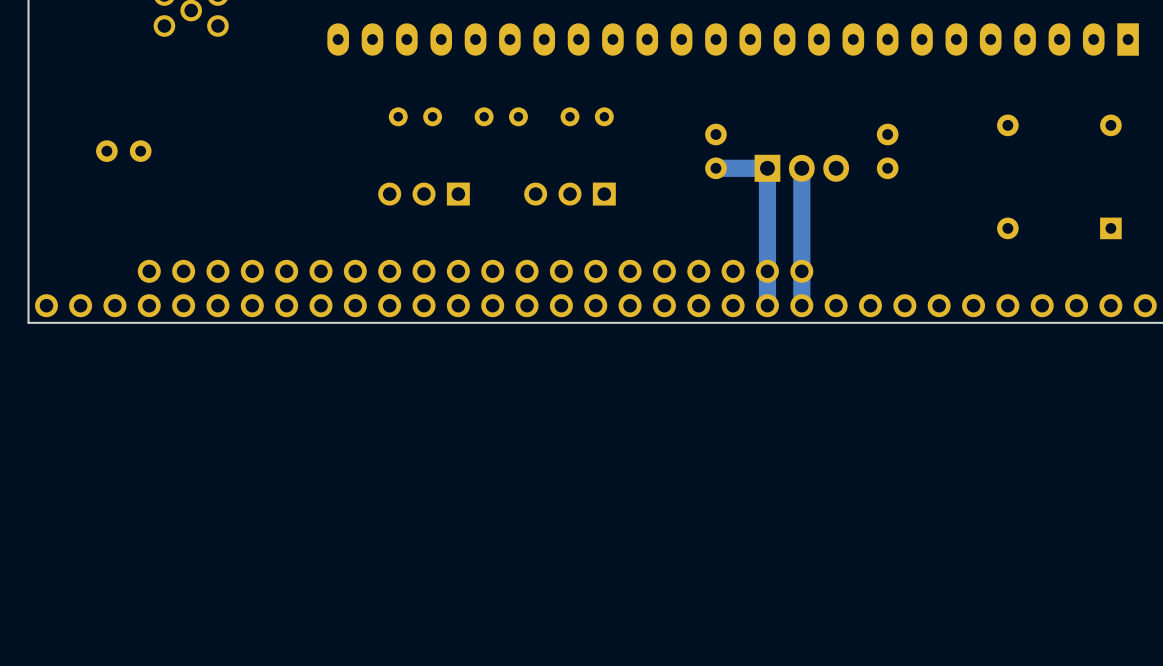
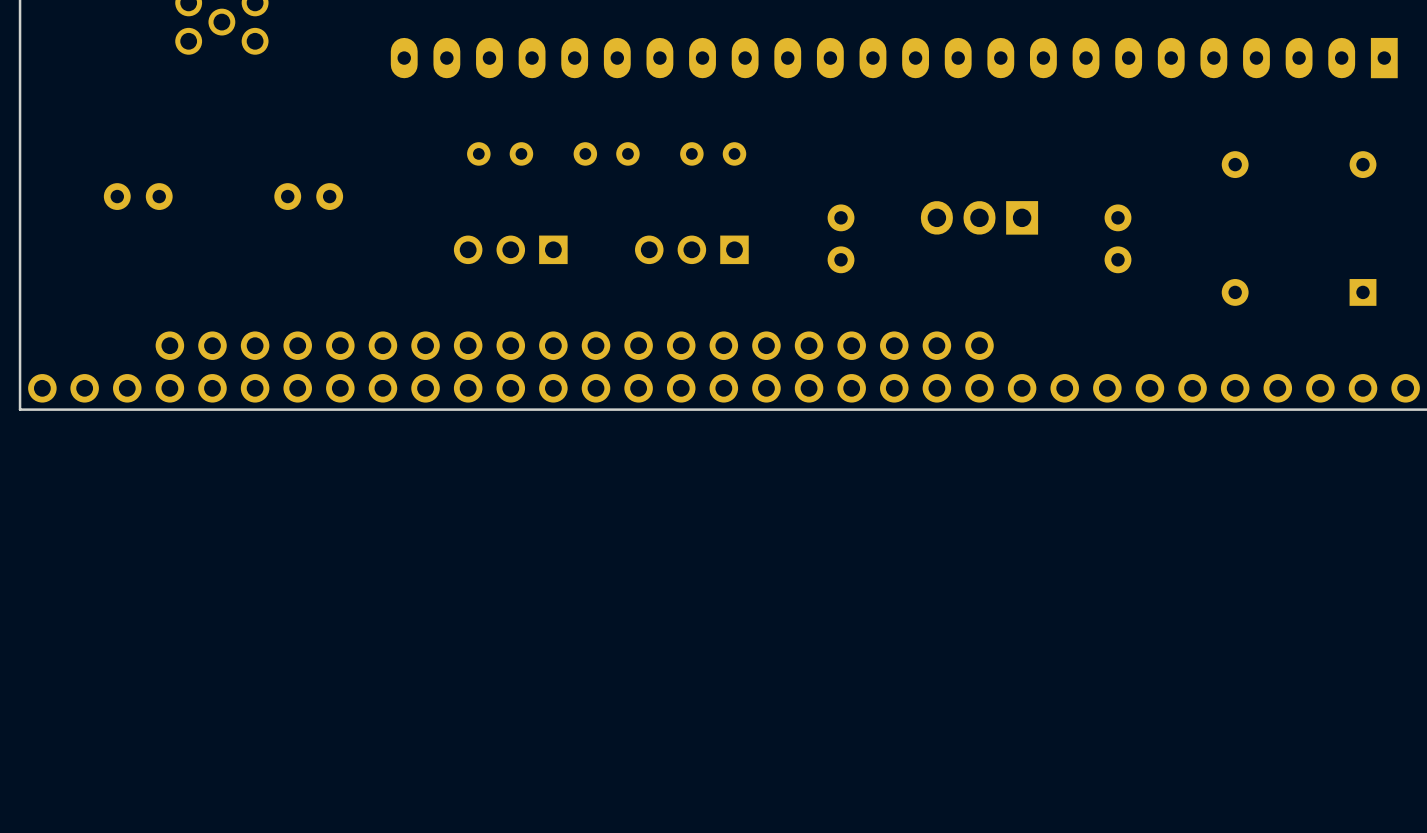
part: none -> (308, 196)
part position: (715, 151) -> (841, 238)
part position: (887, 151) -> (1117, 238)
track: (715, 168) (767, 168) (767, 305) -> none
track: (801, 168) (801, 305) -> none
part rotation: 0° (801, 168) -> 180° (979, 217)

